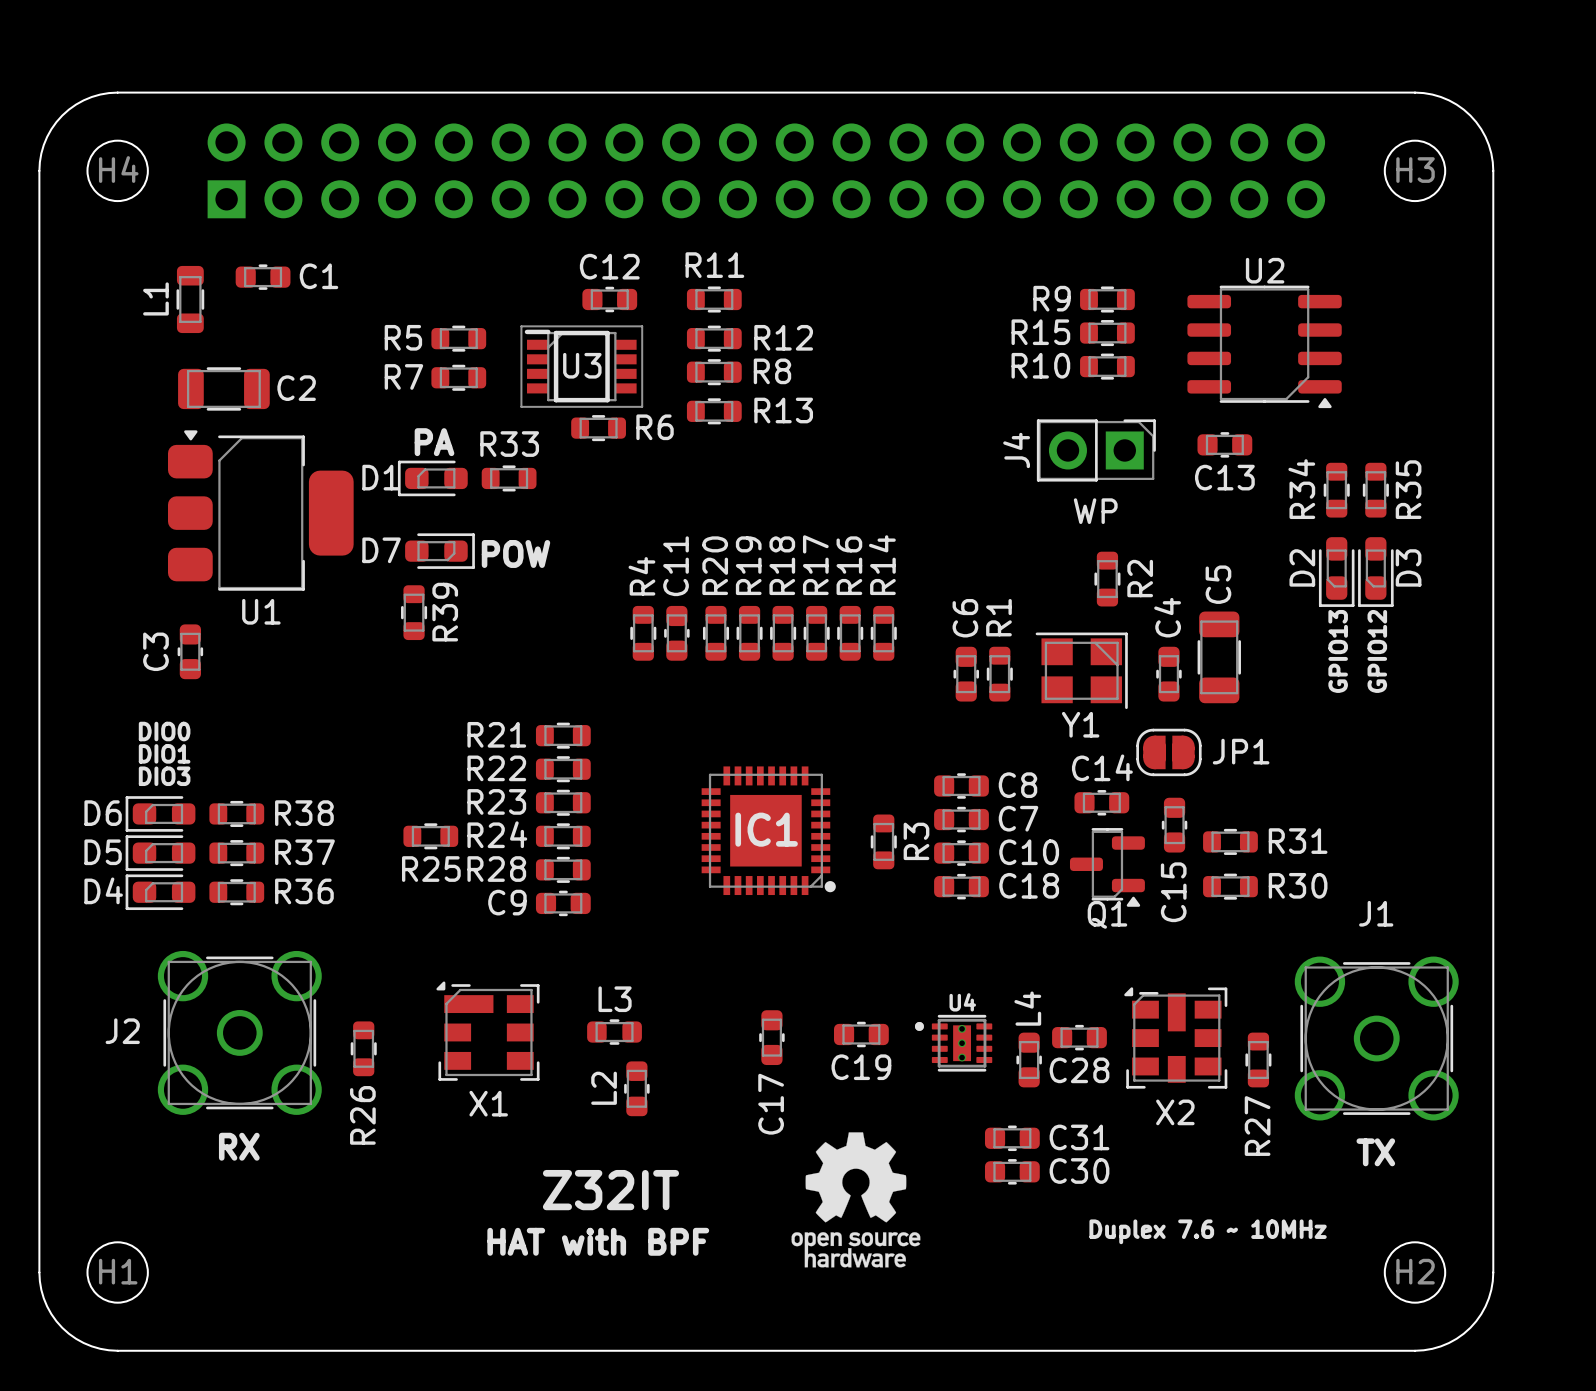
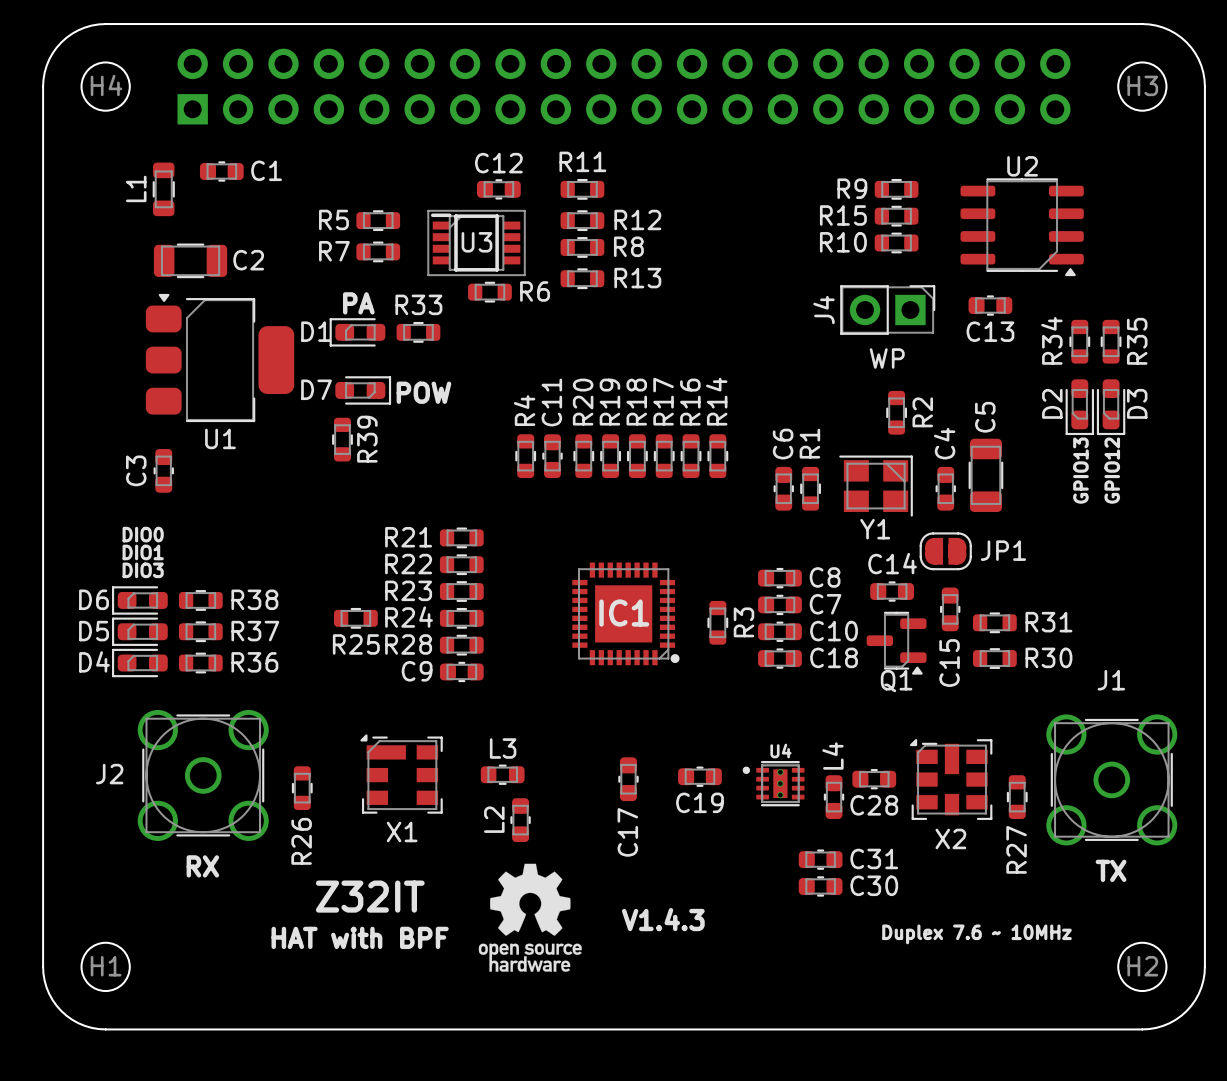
text position: Z32IT (610, 1190) -> Z32IT (370, 896)
drawing position: (855, 1199) -> (530, 917)
text: none -> V1.4.3 (663, 919)
text position: HAT with BPF (598, 1241) -> HAT with BPF (360, 937)

